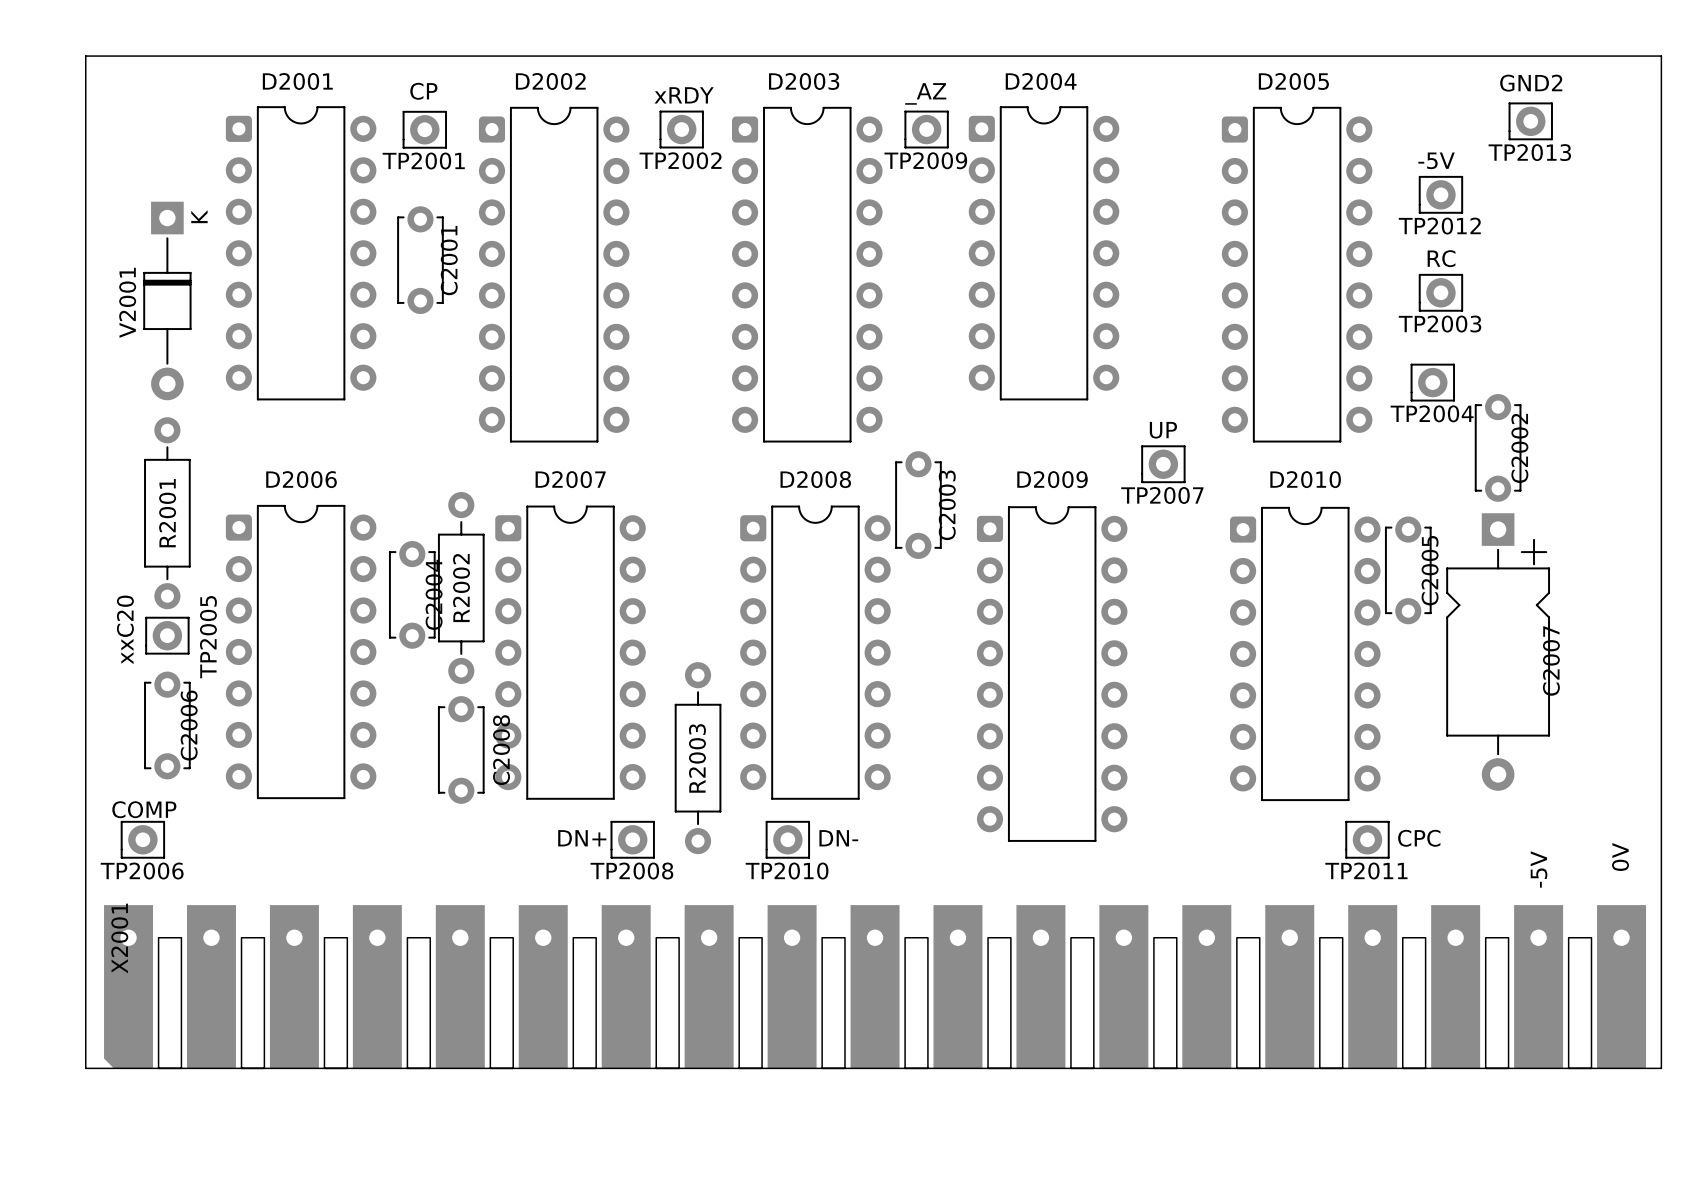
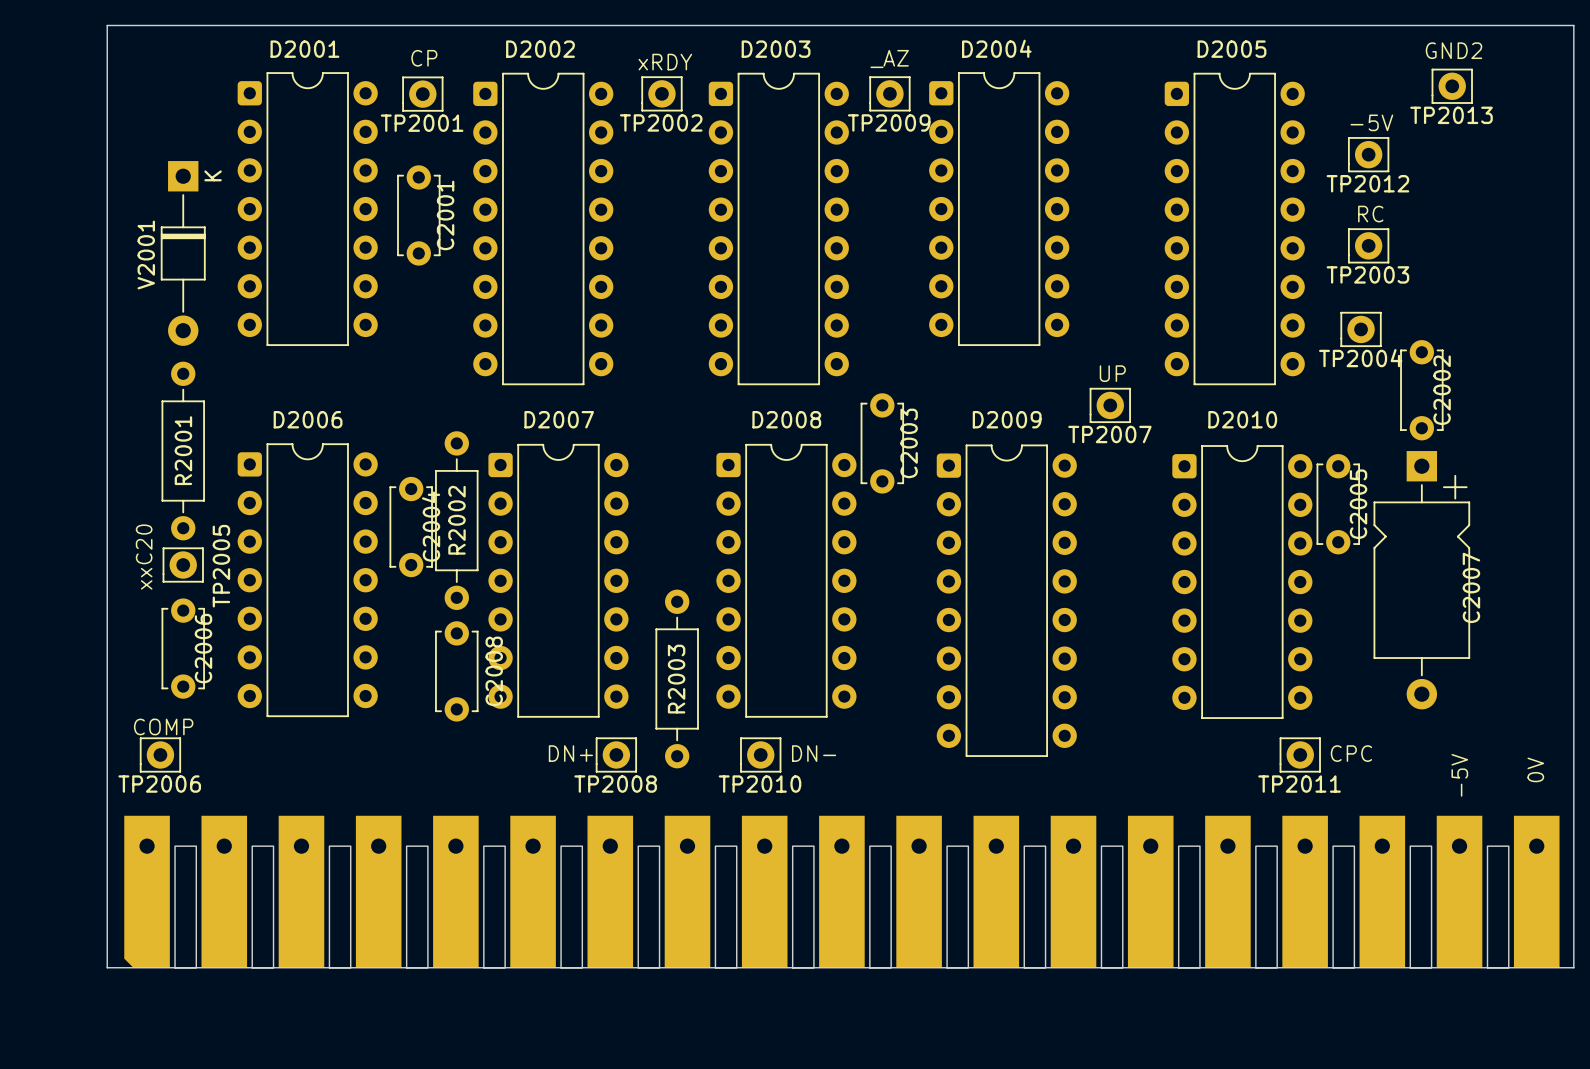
X2001 name: X2001 (119, 938) -> none

